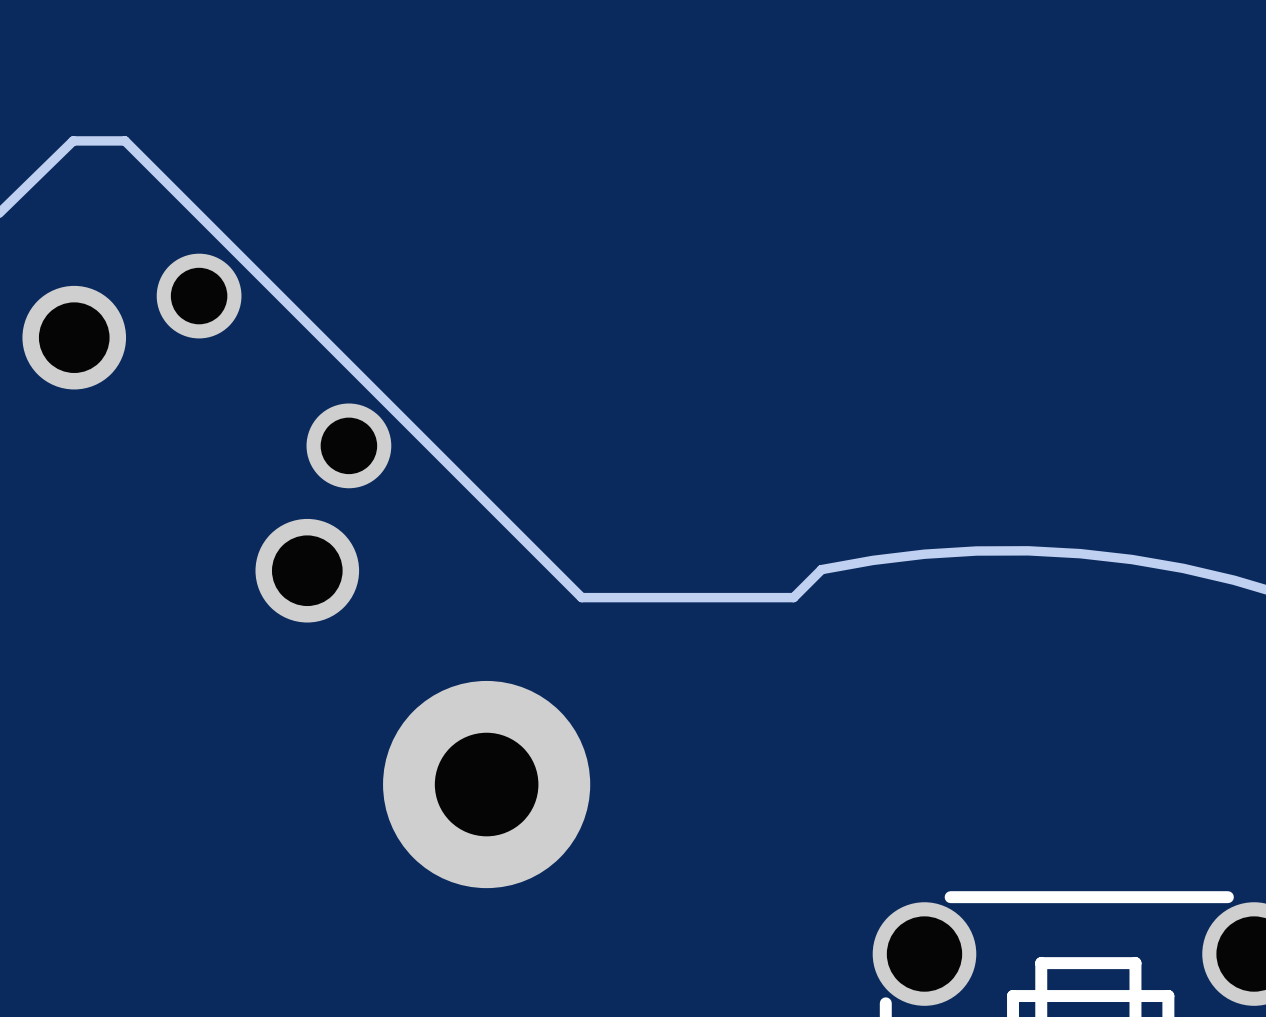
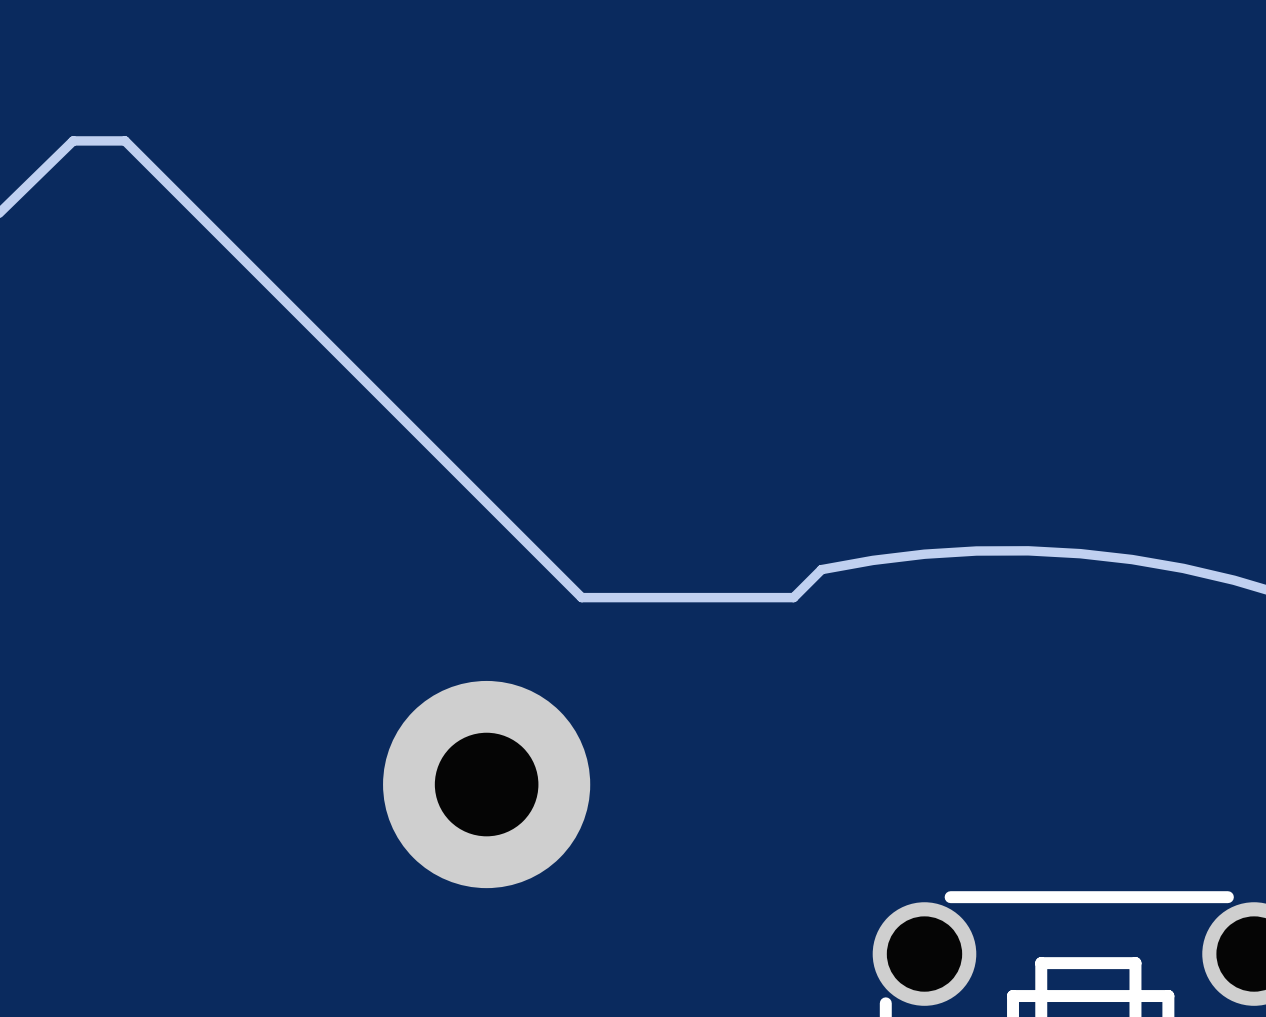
part: (206, 438) -> none

